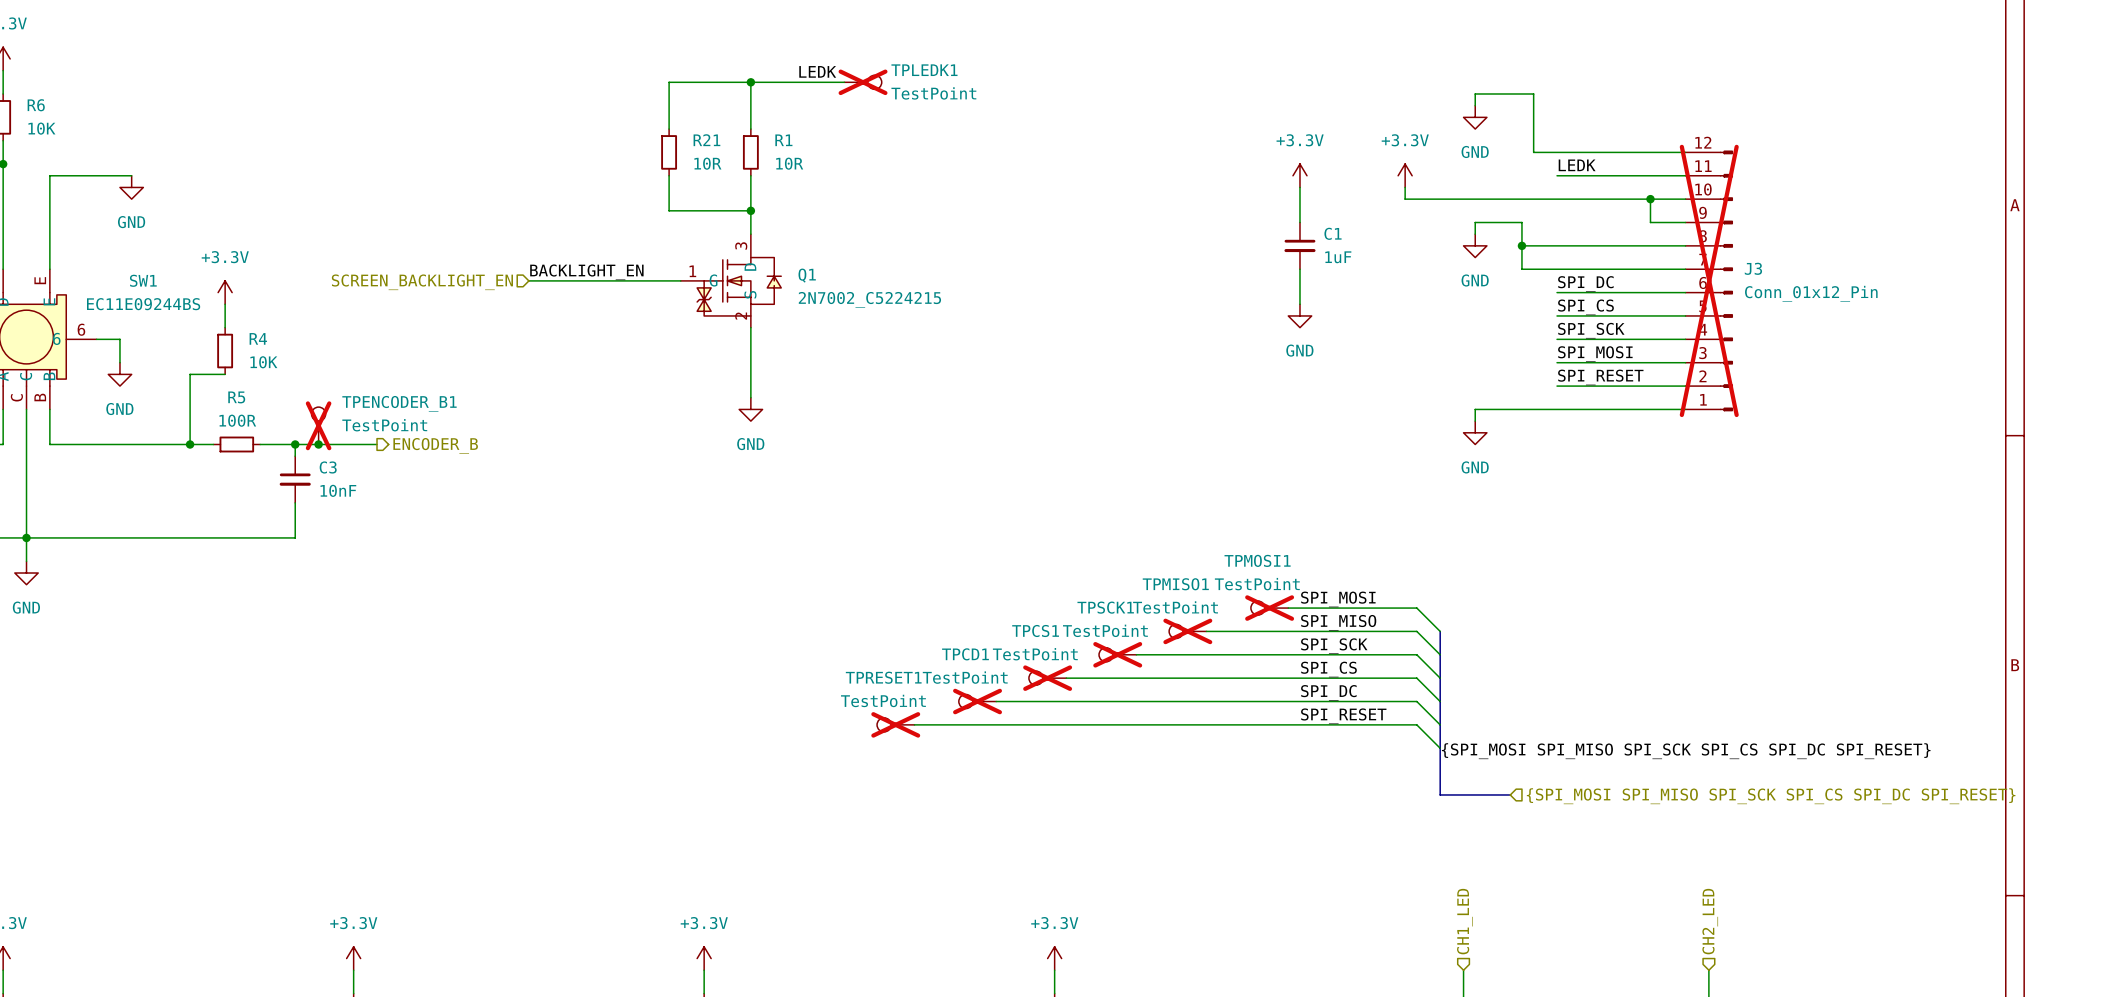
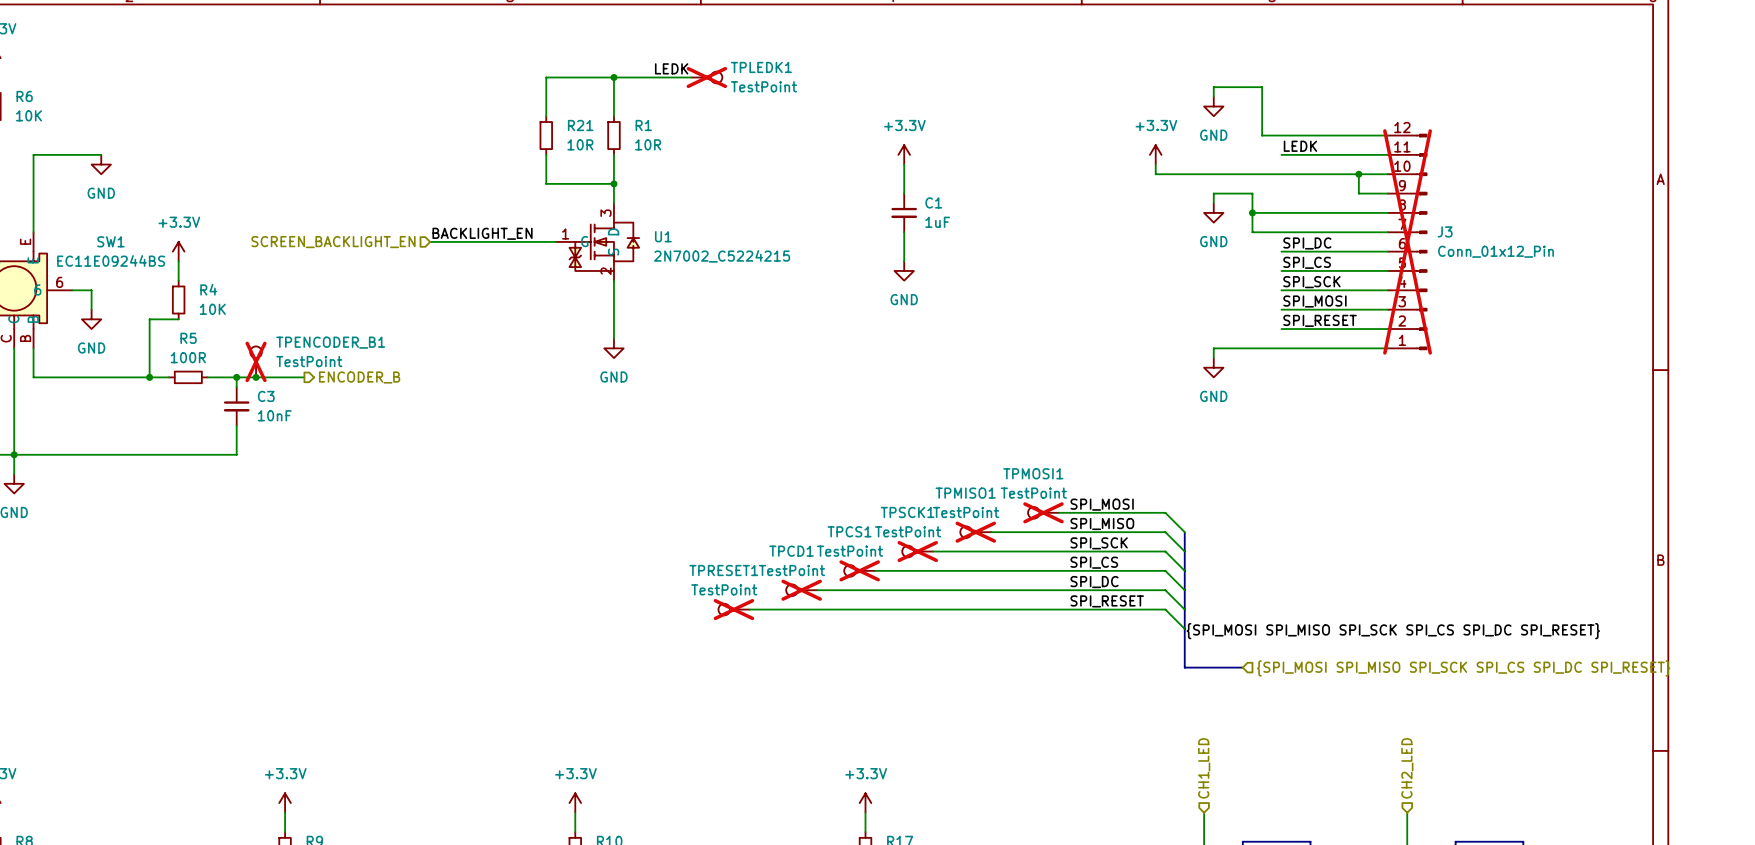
power symbol position: +3.3V (1299, 175) -> +3.3V (904, 154)
wire: (1299, 187) (1299, 222) -> (904, 164) (904, 193)
C1 position: (1299, 245) -> (904, 212)
wire: (1299, 269) (1299, 304) -> (904, 232) (904, 261)
Q1 name: Q1 (807, 275) -> U1 (663, 236)
power symbol position: GND (1299, 315) -> GND (904, 270)

